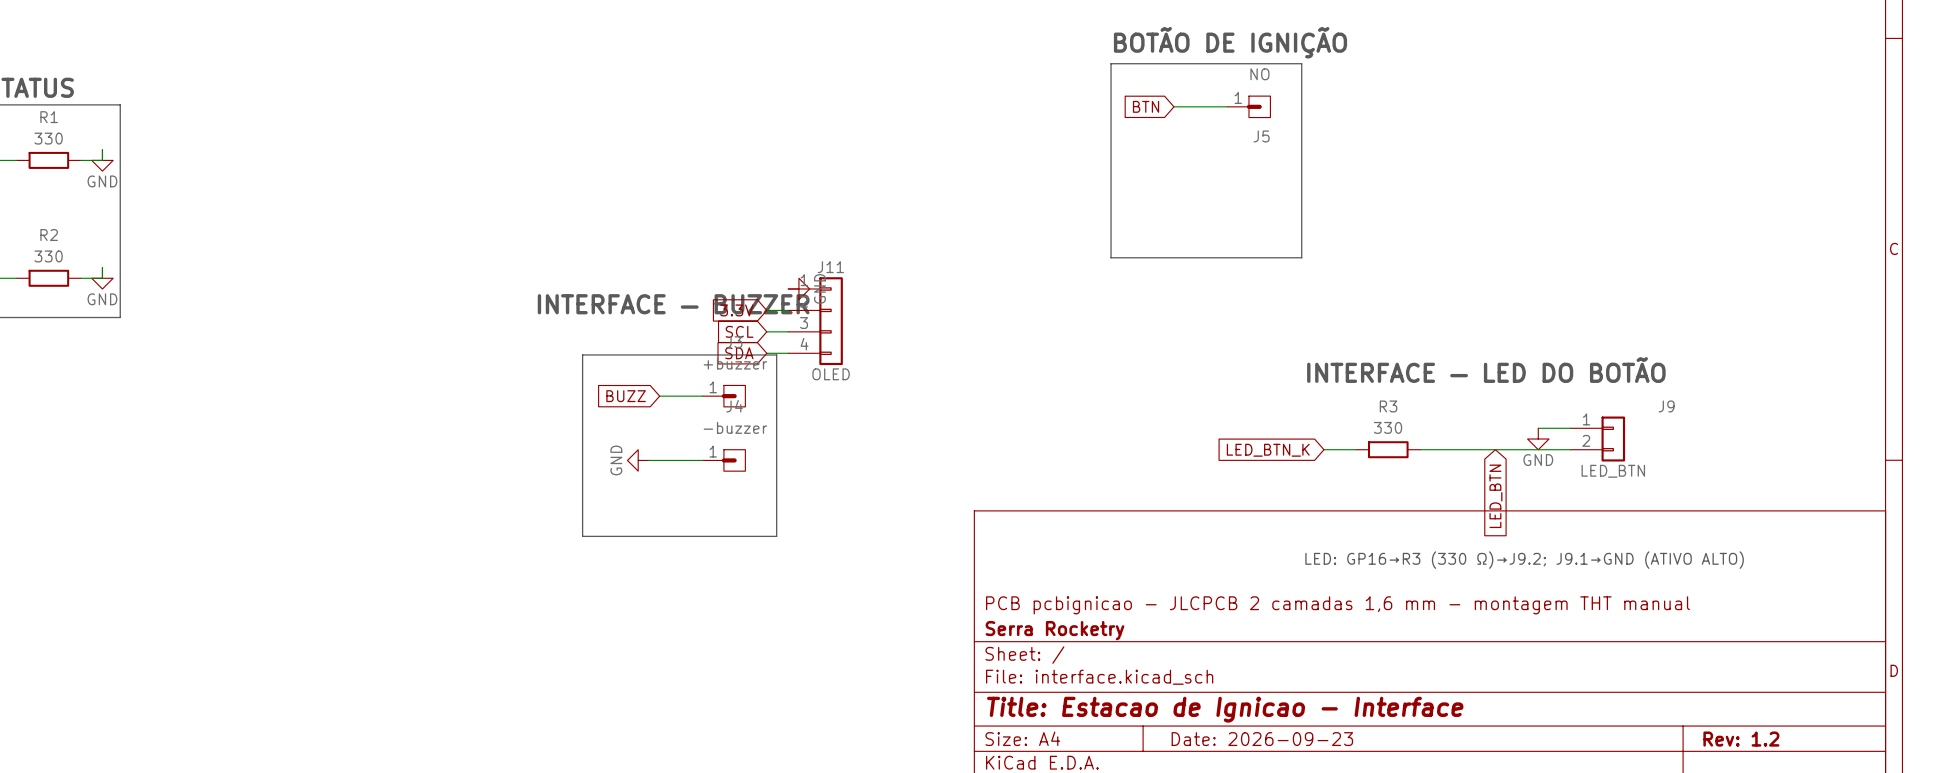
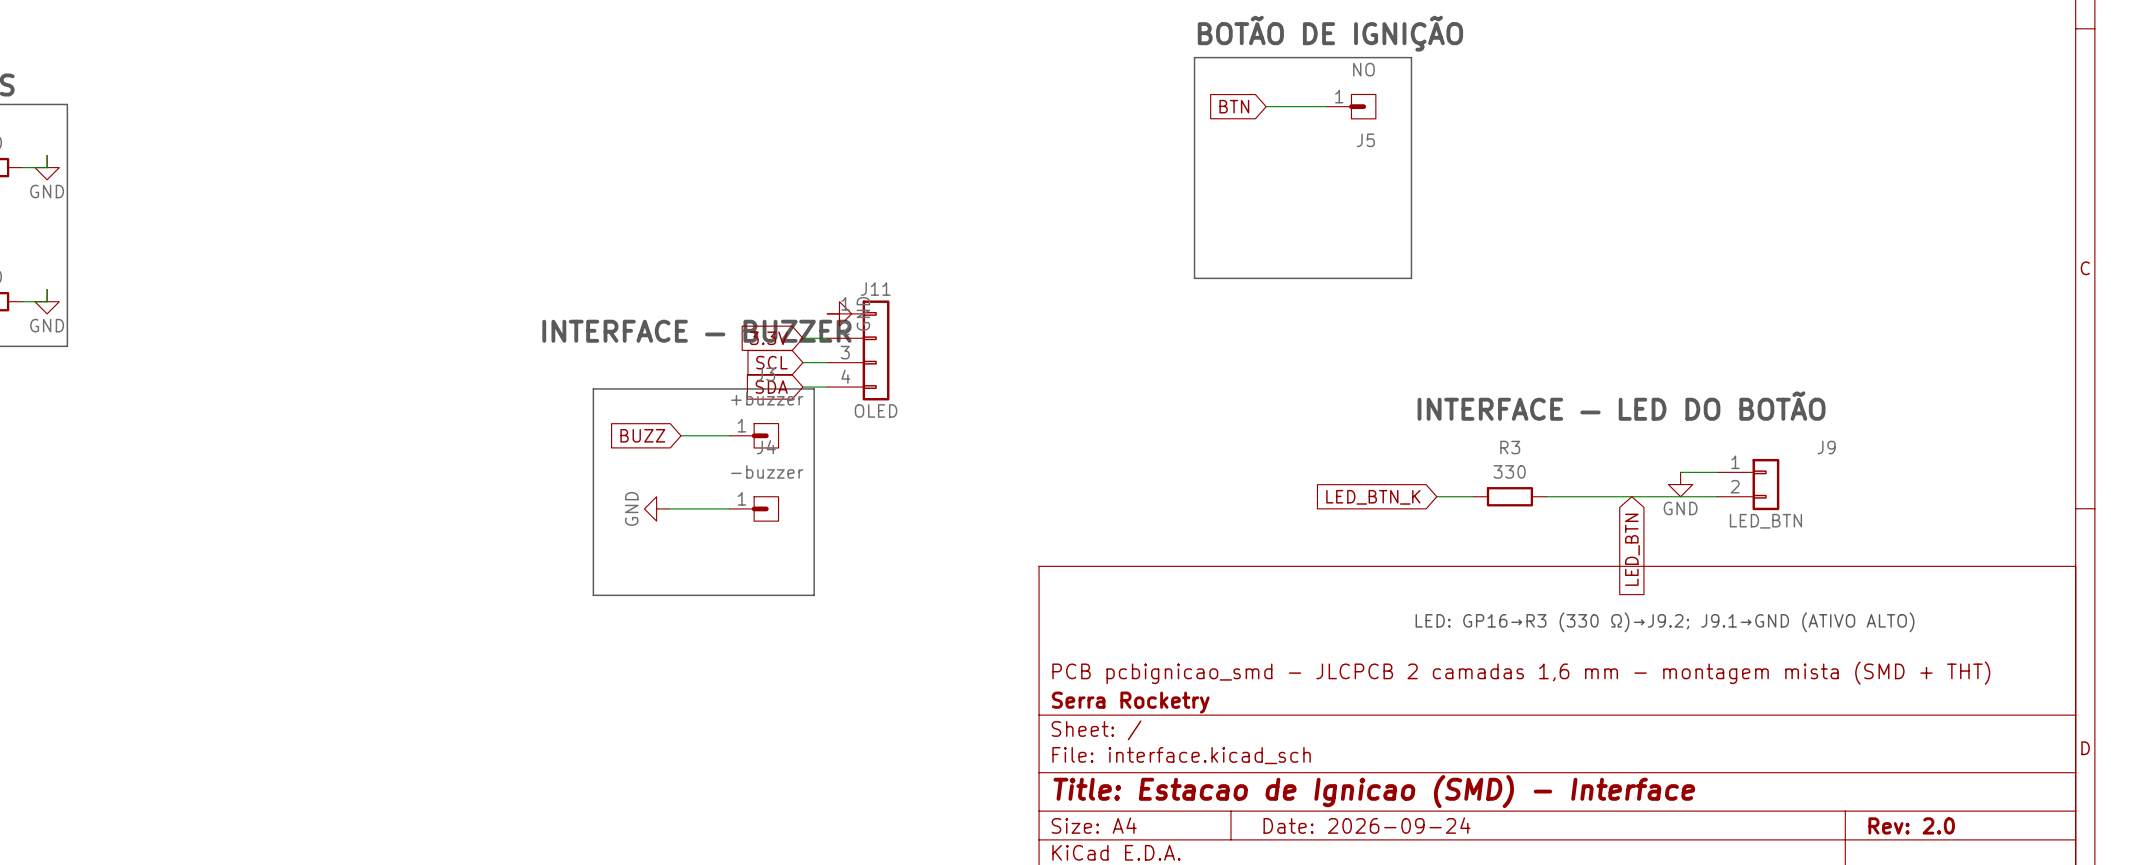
title block: PCB pcbignicao - JLCPCB 2 camadas 1,6 mm - montagem THT manual (1337, 605) -> PCB pcbignicao_smd - JLCPCB 2 camadas 1,6 mm - montagem mista (SMD + THT) (1521, 673)
title block: Title: Estacao de Ignicao - Interface (1225, 709) -> Title: Estacao de Ignicao (SMD) - Interface (1374, 791)
title block: Date: 2026-09-23 (1262, 739) -> Date: 2026-09-24 (1367, 825)
title block: Rev: 1.2 (1741, 739) -> Rev: 2.0 (1911, 825)

